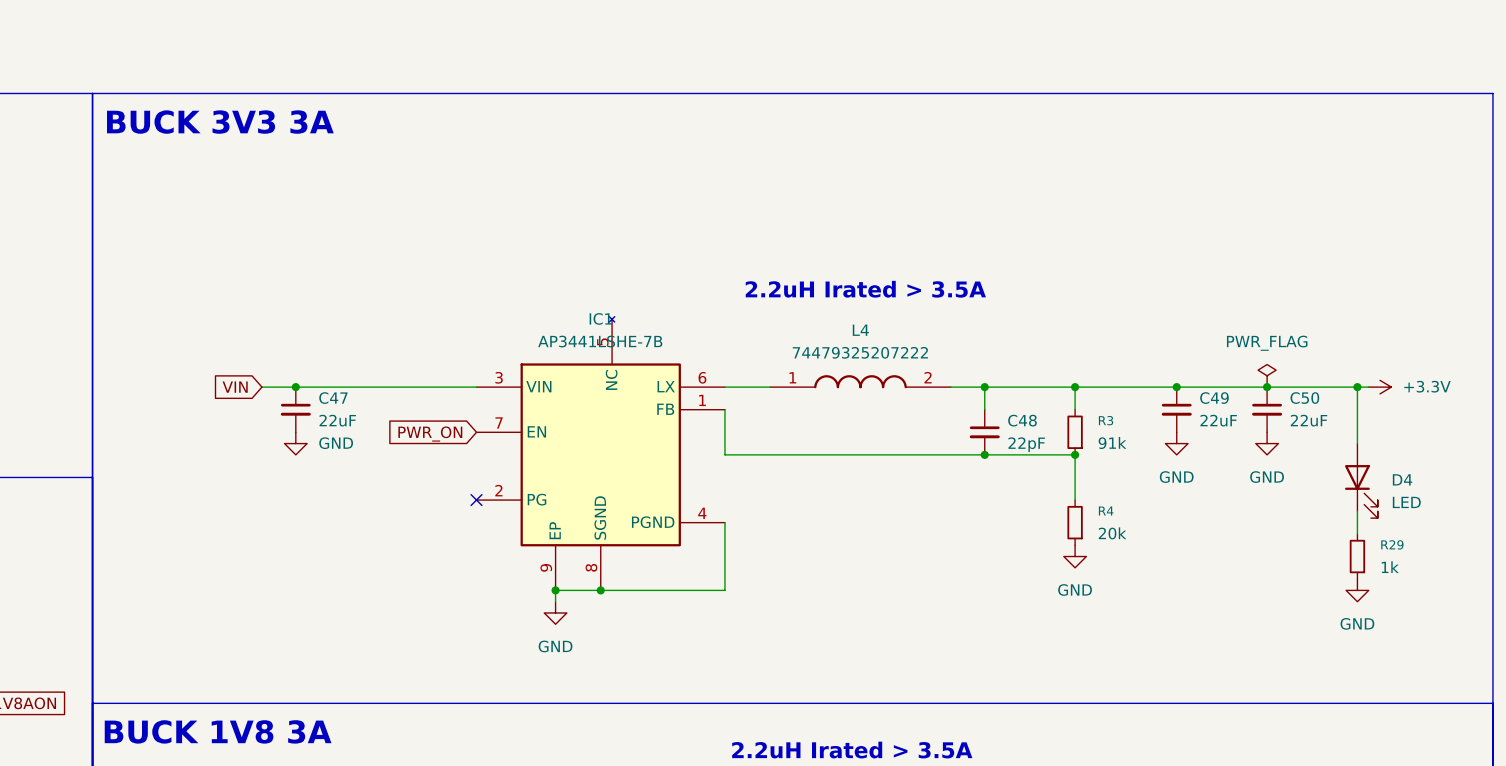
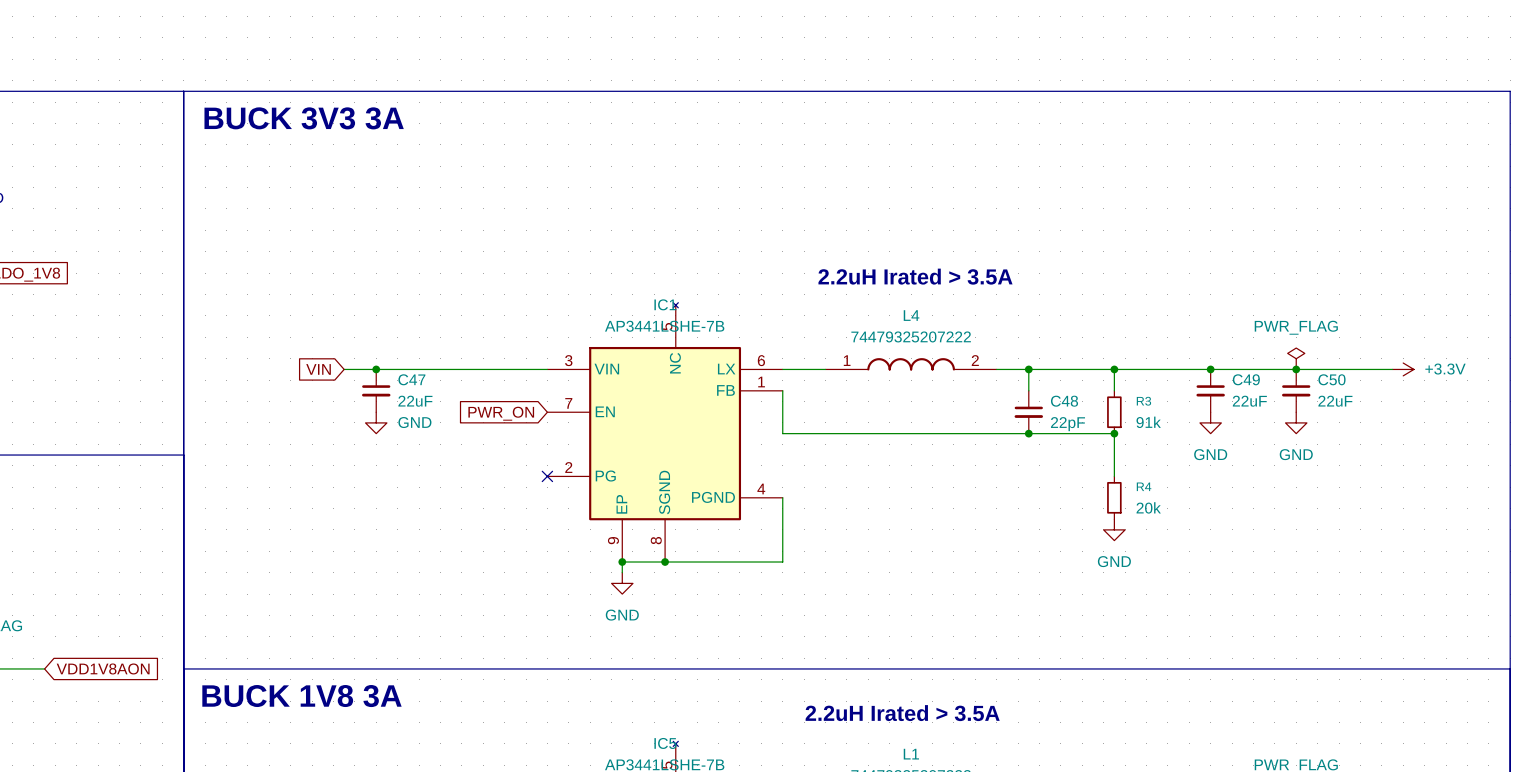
wire: (1357, 387) (1357, 443) -> none
junction: (1357, 387) -> none
D4: LED (1361, 480) -> none
wire: (1357, 511) (1357, 533) -> none
R29: 1k (1357, 556) -> none
power symbol: GND (1357, 590) -> none

